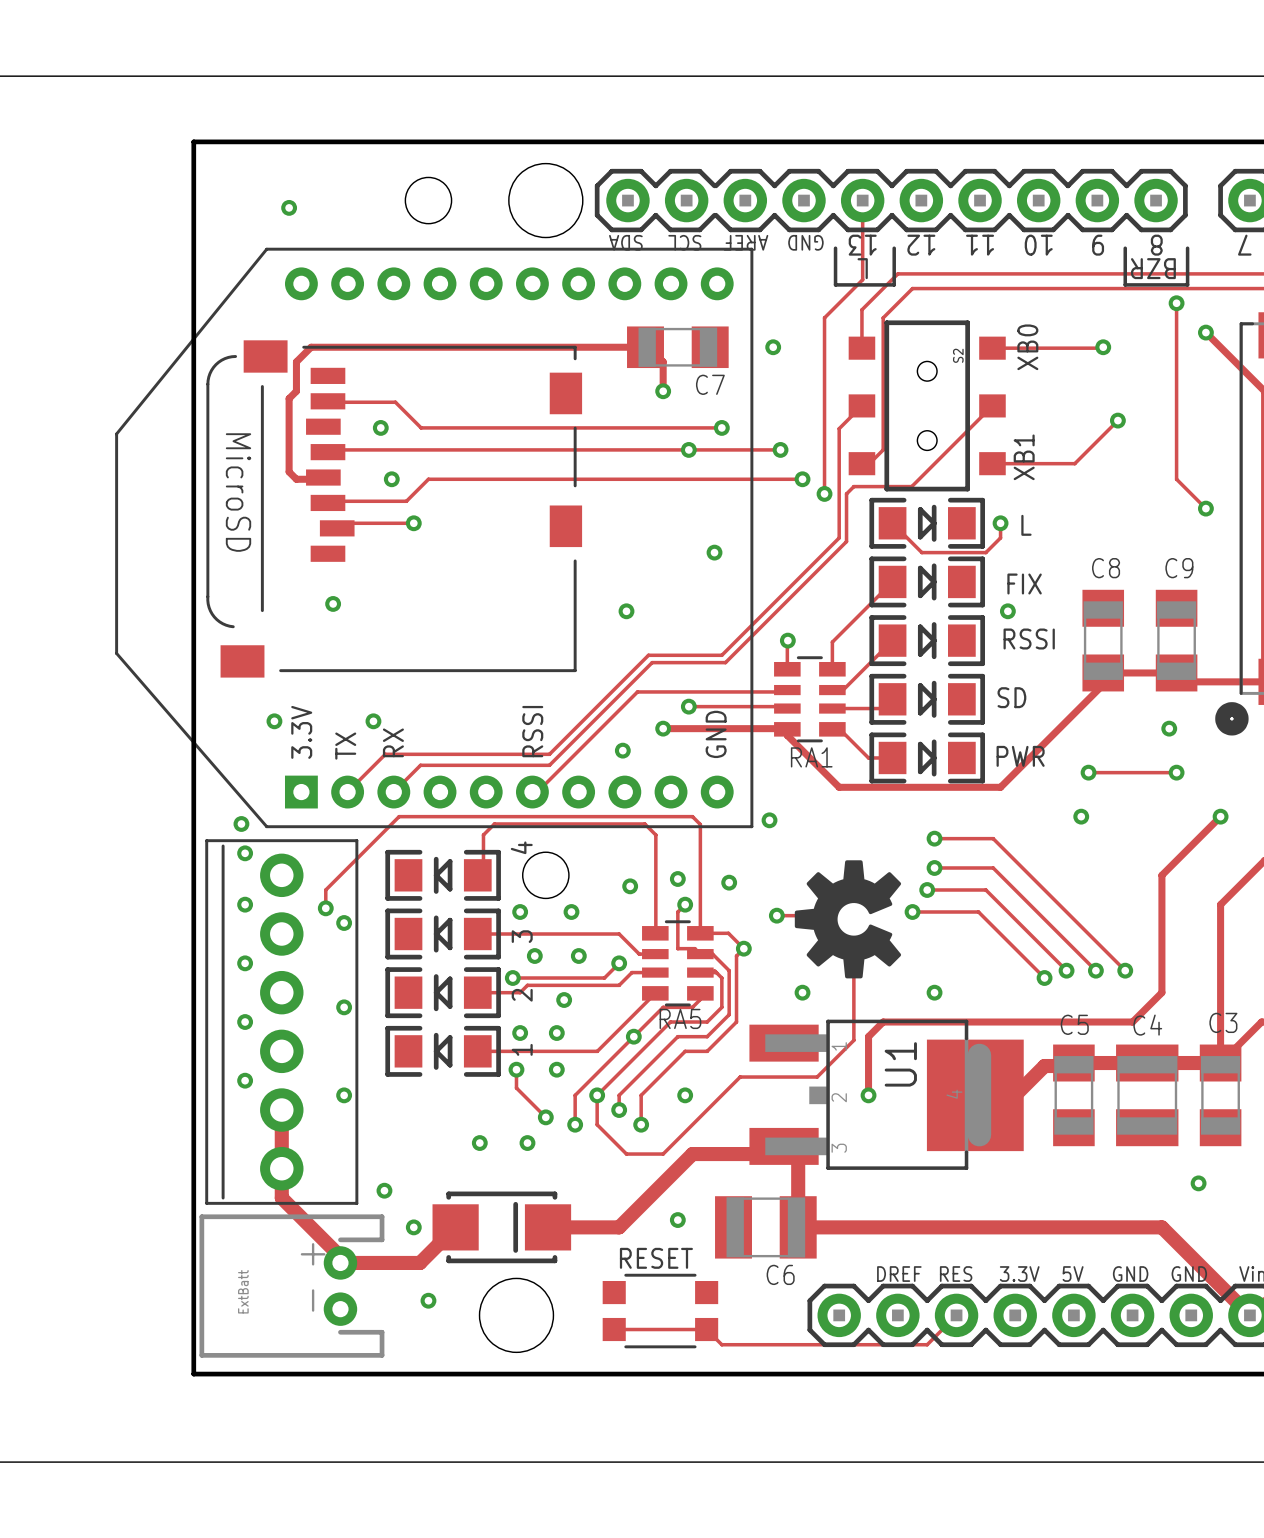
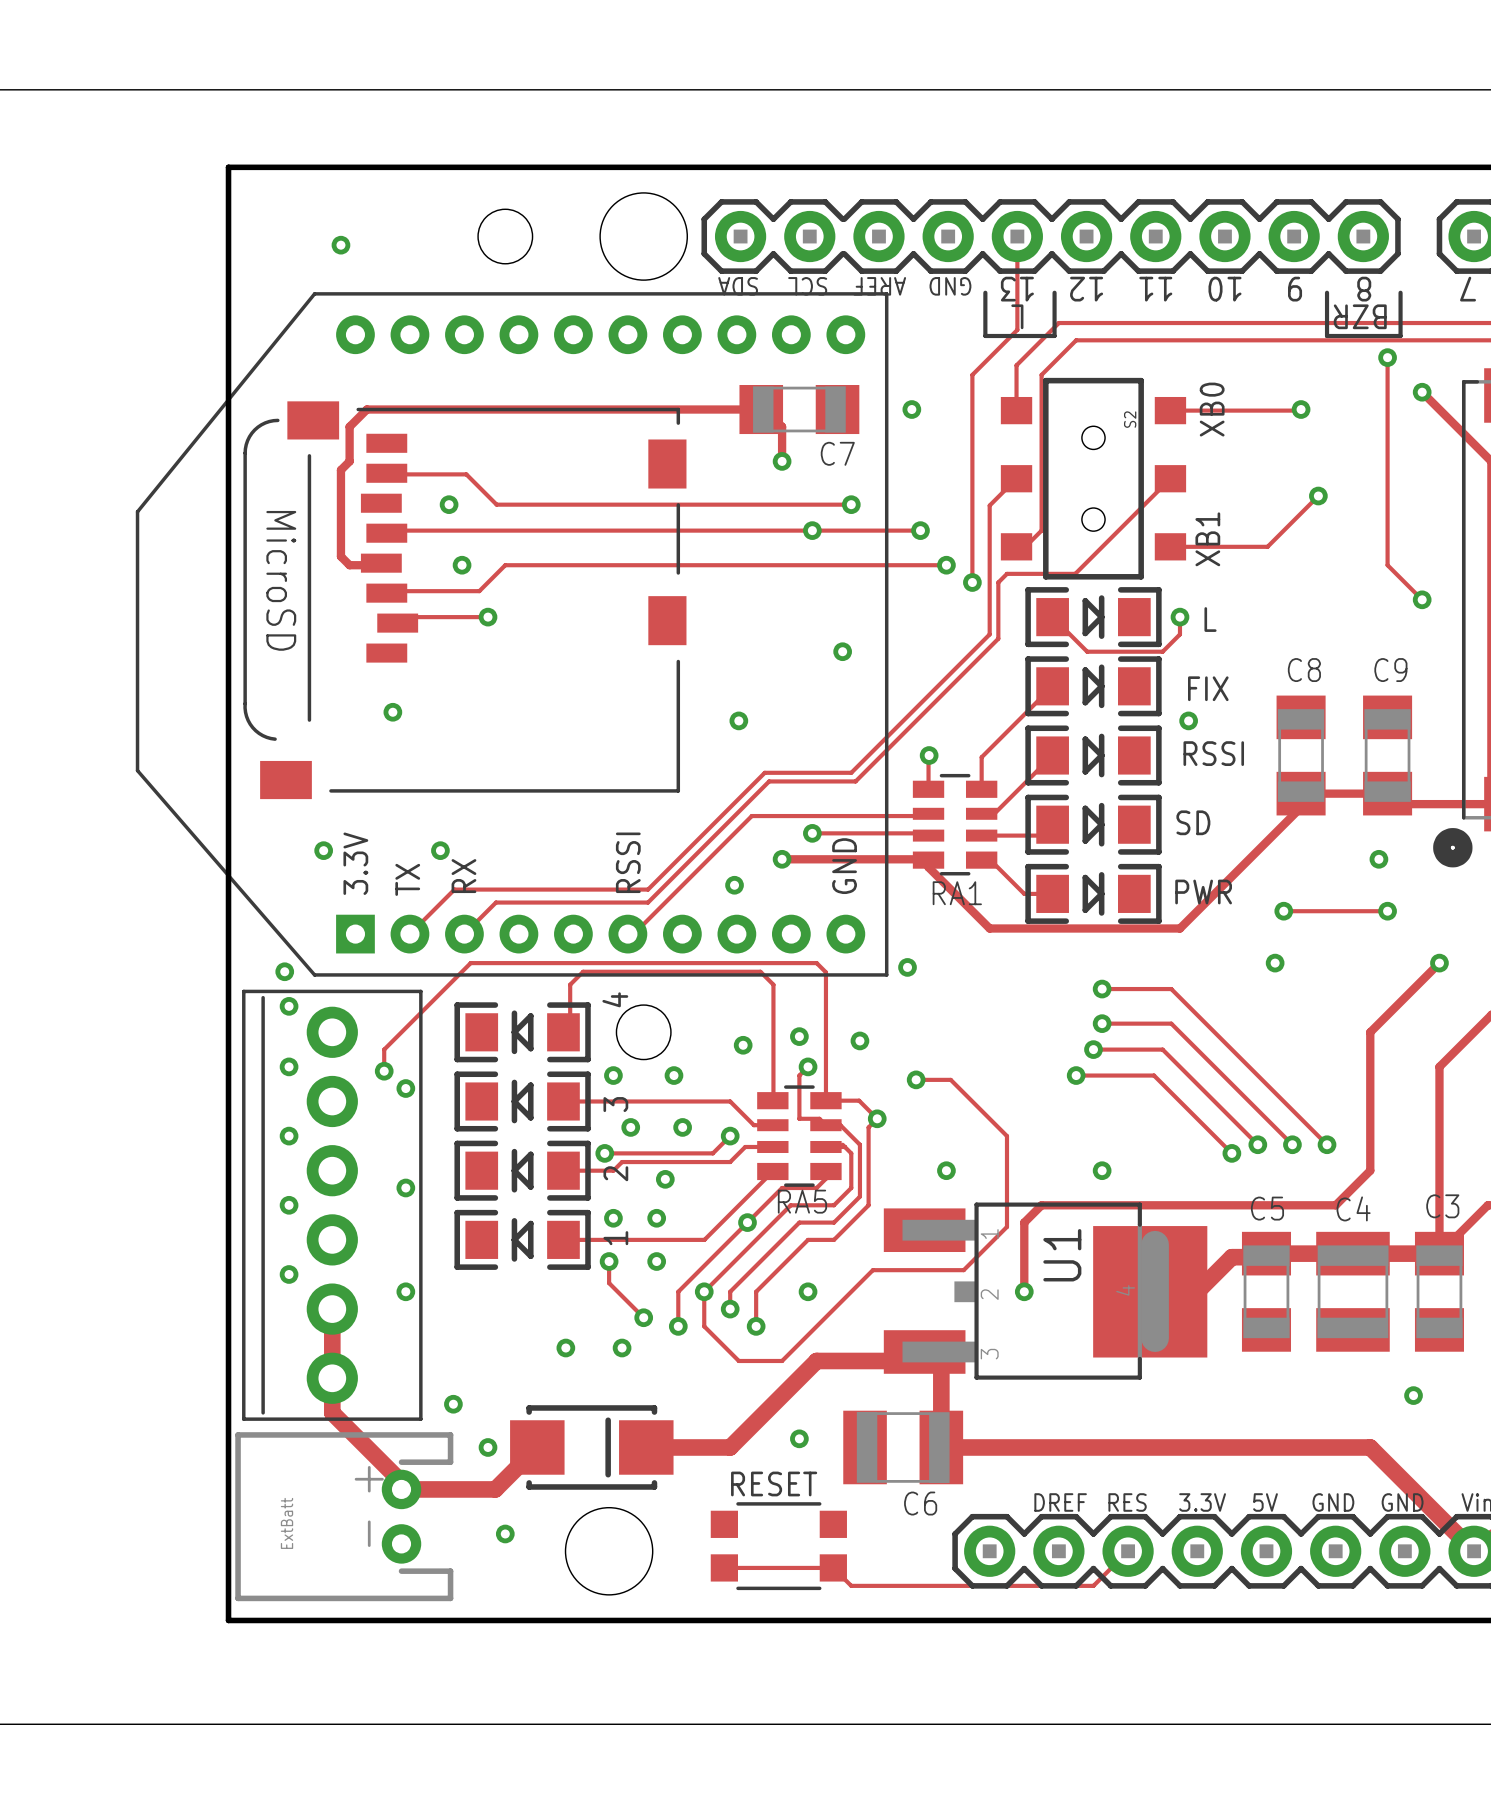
drawing: [794, 860, 902, 979] -> none

